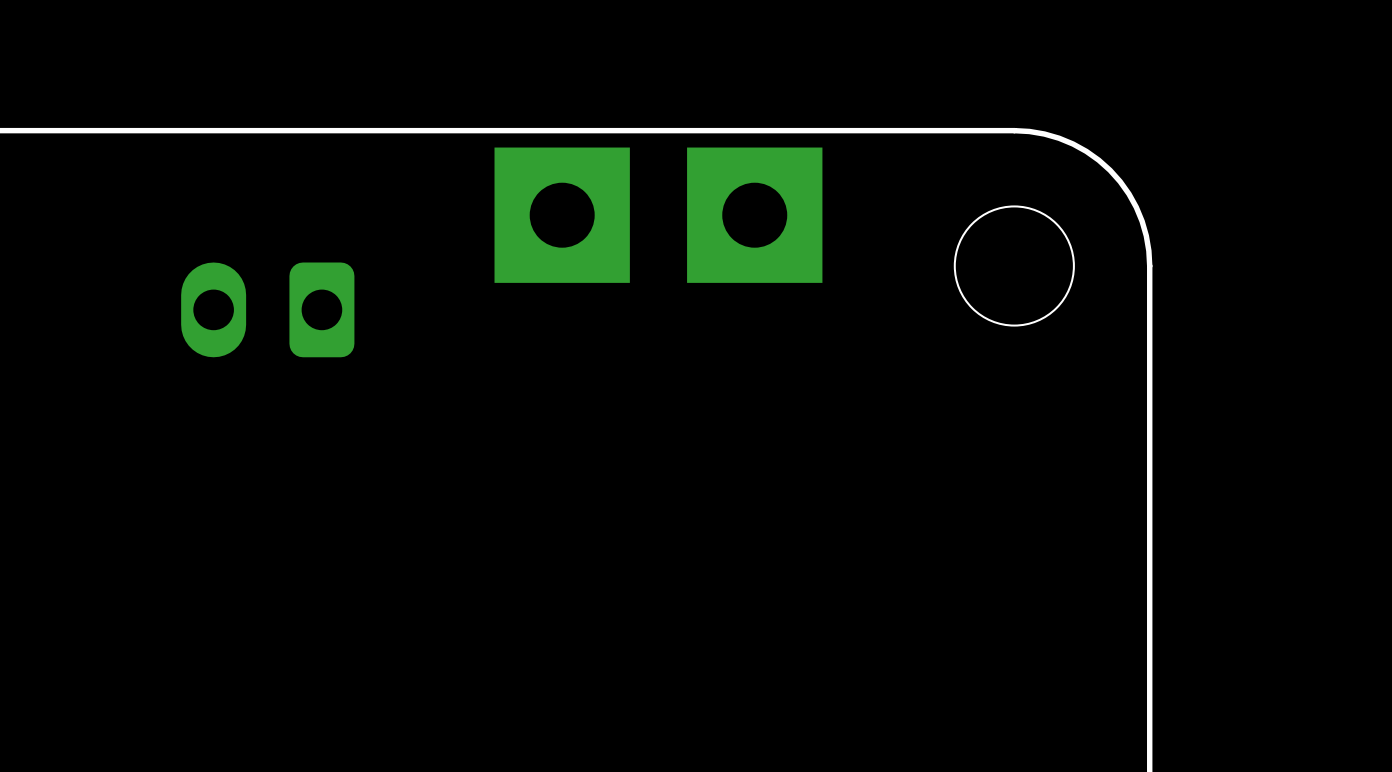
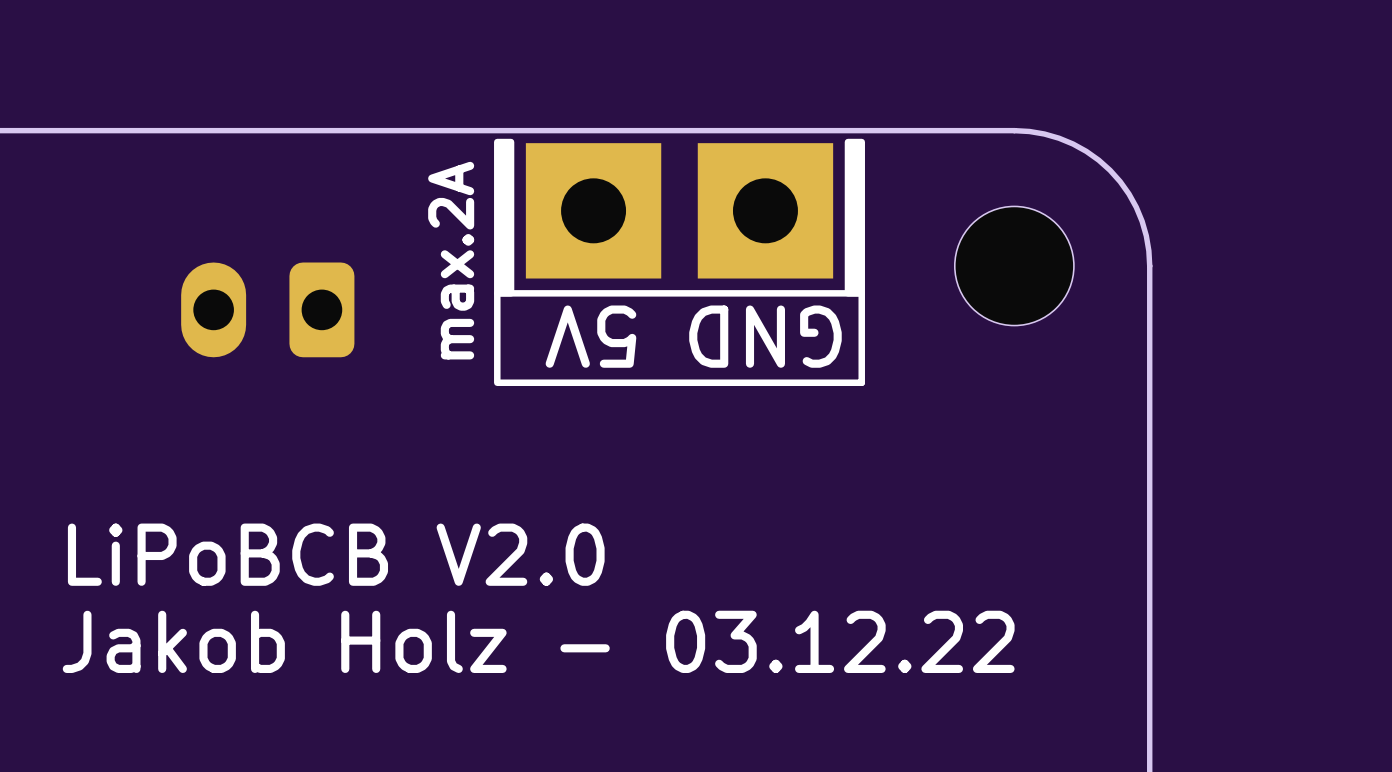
part: (562, 215) -> none
part: (754, 215) -> none
text: none -> max.2A (451, 260)
part: none -> (679, 262)
text: none -> LiPoBCB V2.0 (336, 554)
text: none -> Jakob Holz - 03.12.22 (538, 641)

